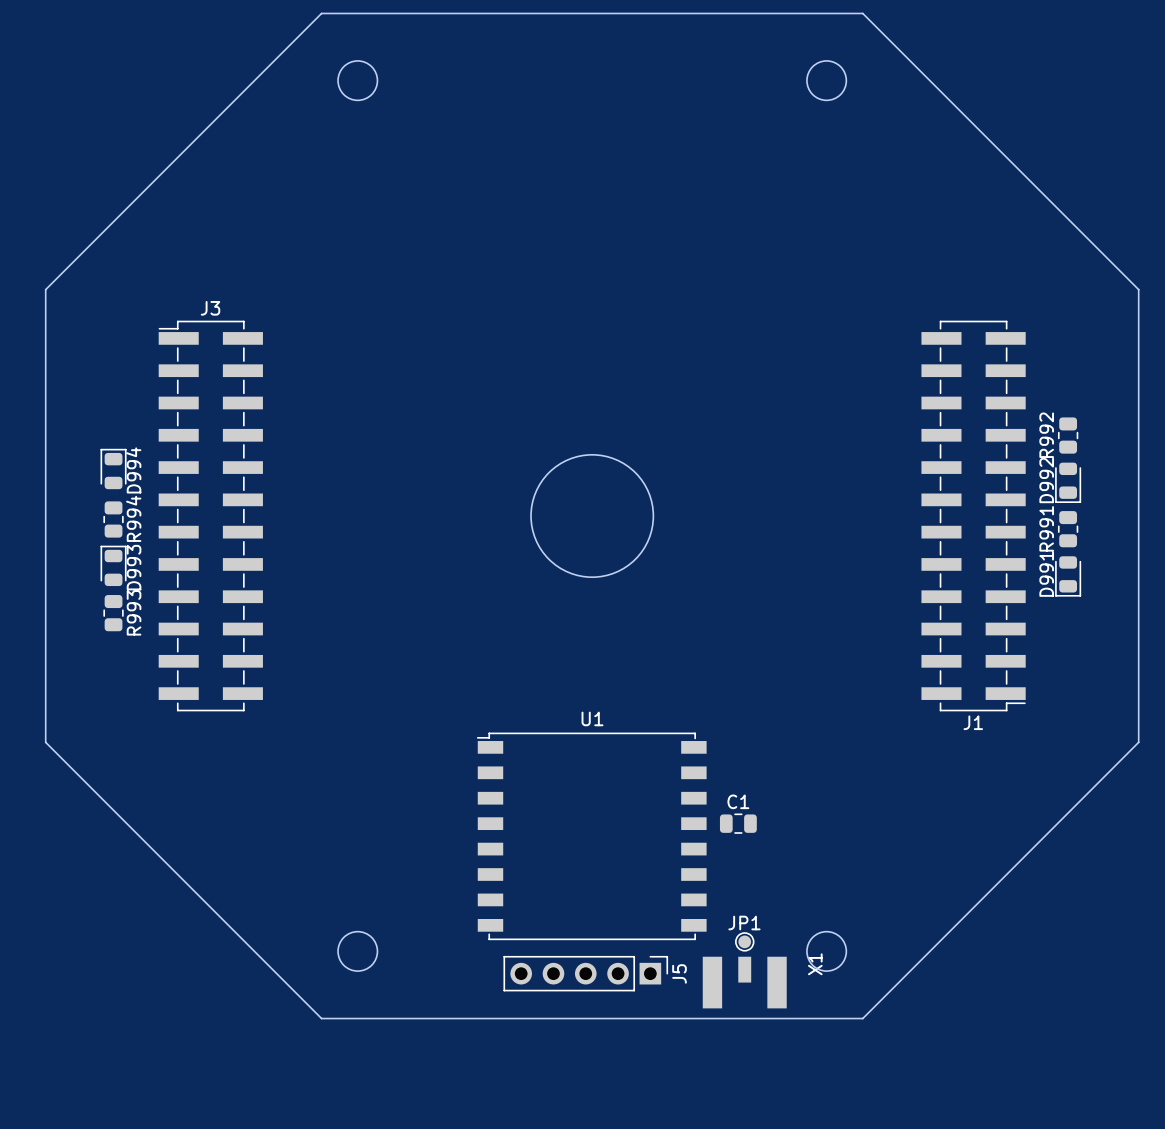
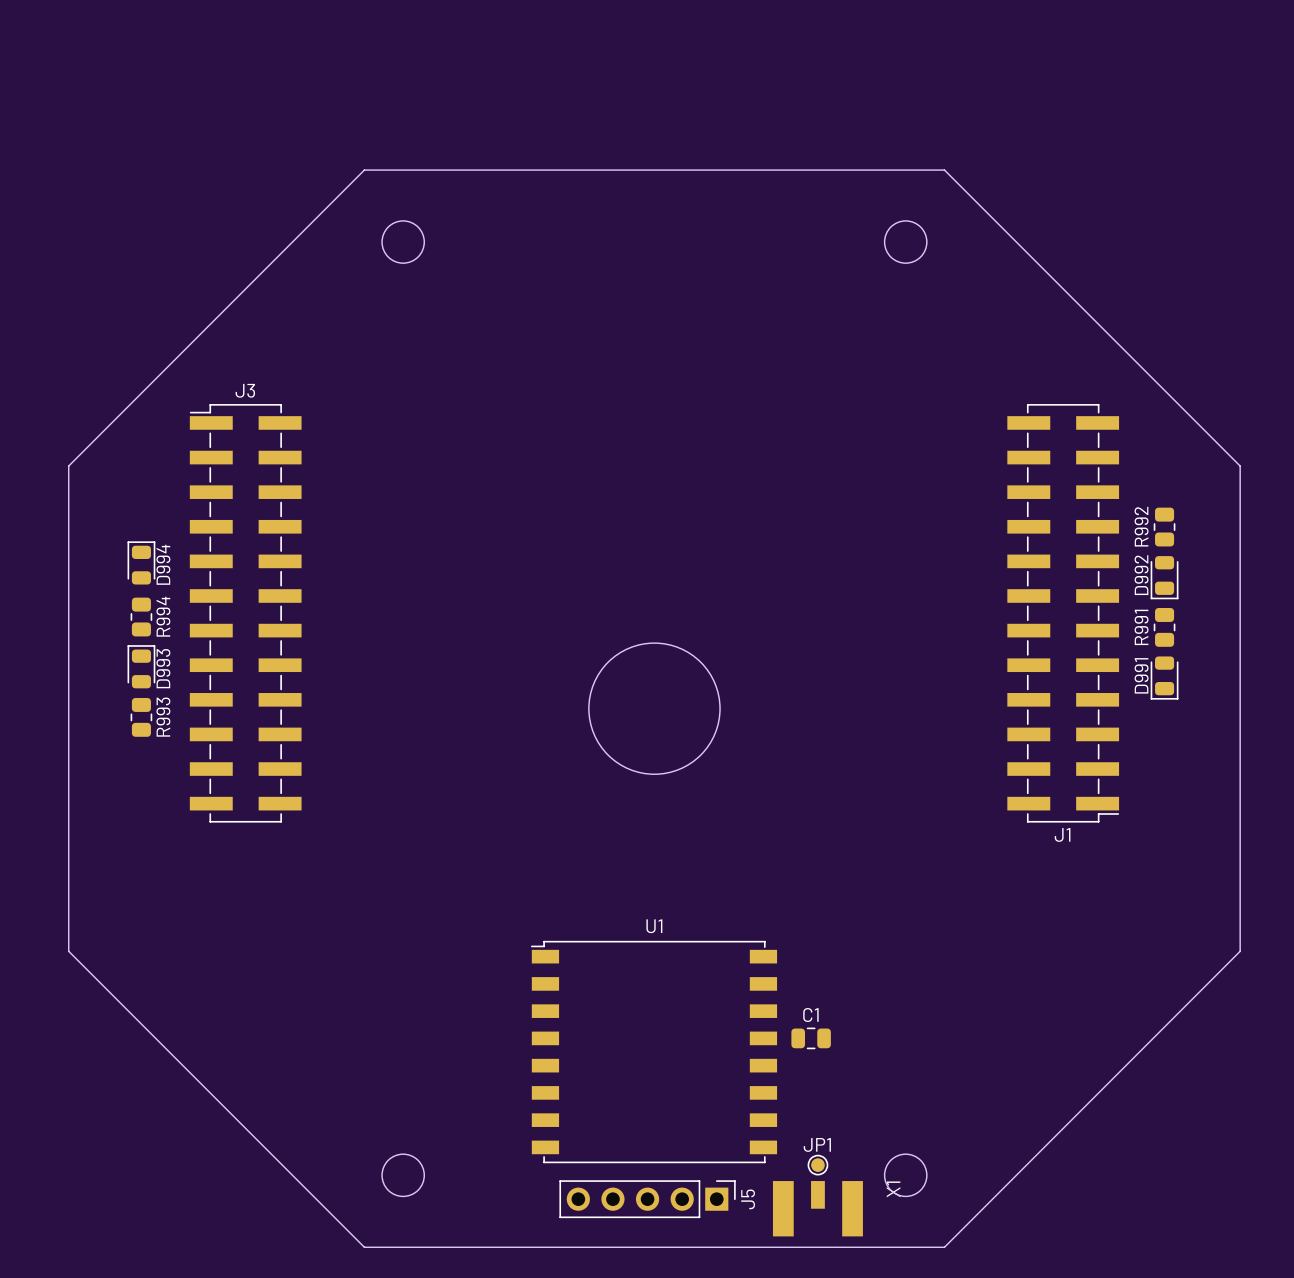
round board edge position: (357, 80) -> (403, 242)
round board edge position: (826, 80) -> (905, 242)
board edge: (45, 378) (45, 289) (321, 13) (862, 13) (1138, 289) (1138, 378) -> (68, 466) (364, 170) (944, 170) (1240, 466)
round board edge position: (592, 516) -> (654, 708)
board edge: (45, 742) (321, 1018) (862, 1018) (1138, 742) -> (68, 855) (68, 951) (364, 1247) (944, 1247) (1240, 951) (1240, 855)
C1 position: (738, 823) -> (811, 1038)
U1 position: (591, 836) -> (654, 1052)
JP1 position: (744, 941) -> (817, 1165)
round board edge position: (357, 951) -> (403, 1175)
round board edge position: (826, 951) -> (905, 1175)
J5 position: (585, 973) -> (647, 1199)
X1 position: (744, 982) -> (817, 1208)

